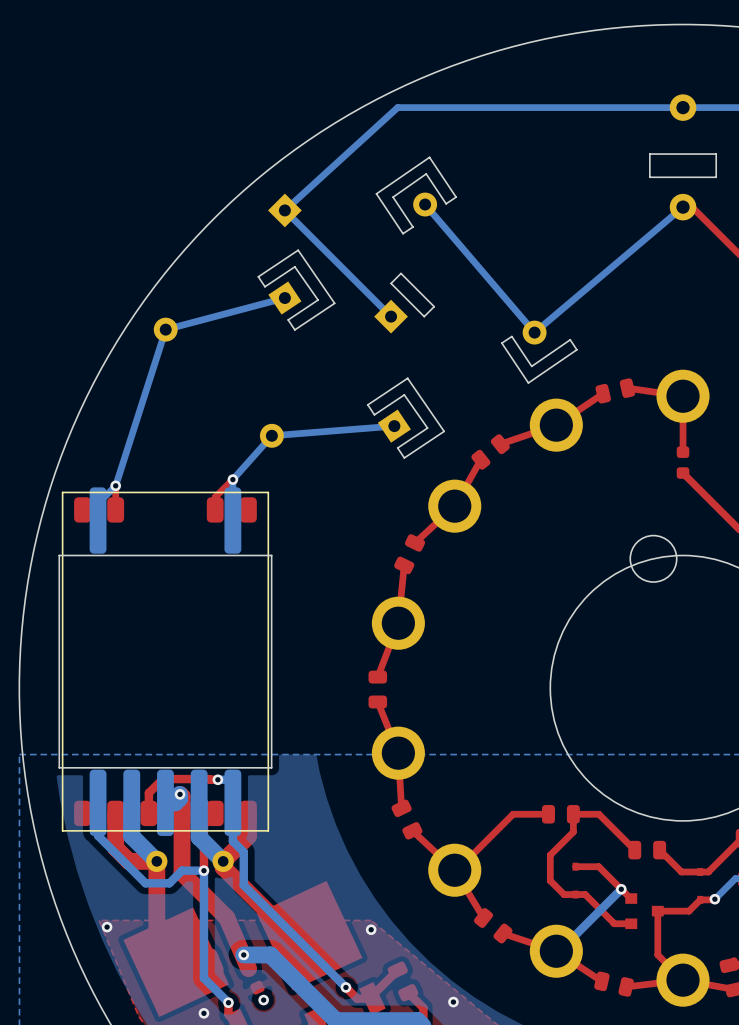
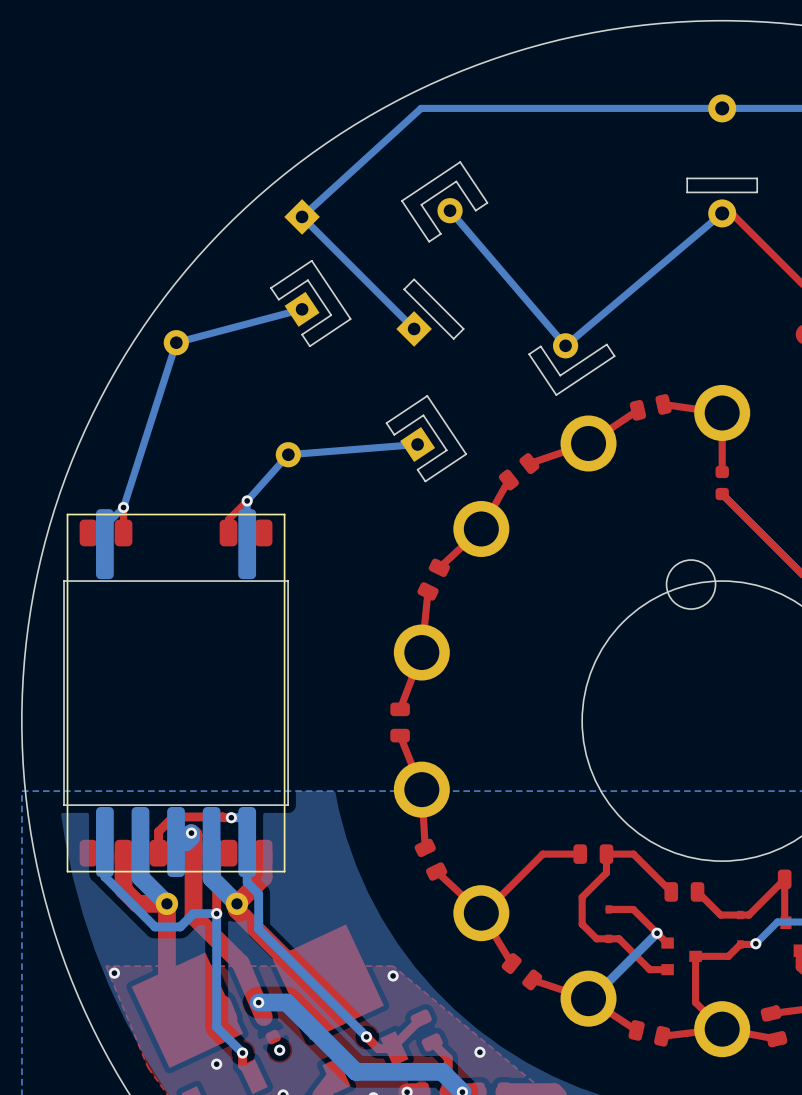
board edge: (716, 154) (716, 177) (649, 177) (649, 154) (716, 154) -> none
drawing: none -> [401, 161, 489, 243]
board edge: (429, 157) (376, 193) (403, 233) (412, 227) (393, 197) (426, 173) (446, 203) (456, 197) (429, 157) -> none
drawing: none -> [686, 177, 759, 194]
board edge: (298, 250) (258, 276) (264, 286) (294, 266) (318, 300) (288, 319) (294, 329) (334, 303) (298, 250) -> none
drawing: none -> [270, 259, 352, 348]
drawing: none -> [403, 278, 465, 340]
board edge: (401, 273) (434, 306) (424, 316) (391, 283) (401, 273) -> none
drawing: none -> [528, 343, 616, 396]
board edge: (511, 336) (531, 366) (570, 339) (576, 349) (528, 382) (501, 343) (511, 336) -> none
board edge: (407, 378) (444, 431) (404, 457) (397, 448) (427, 428) (404, 394) (374, 414) (367, 404) (407, 378) -> none
drawing: none -> [385, 395, 468, 483]

